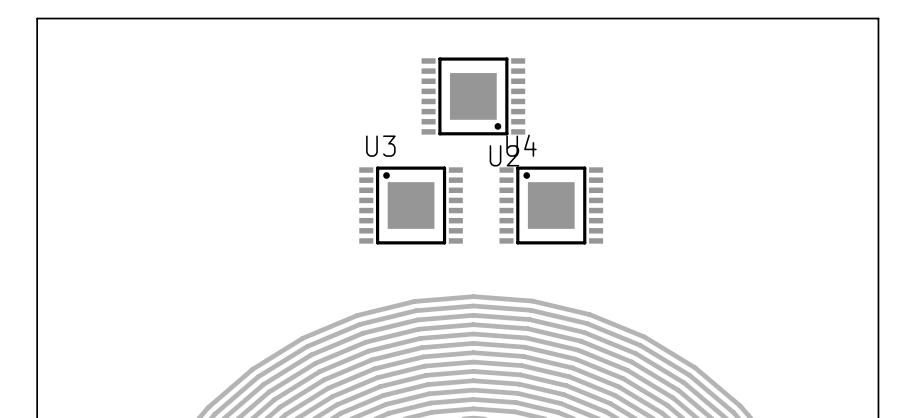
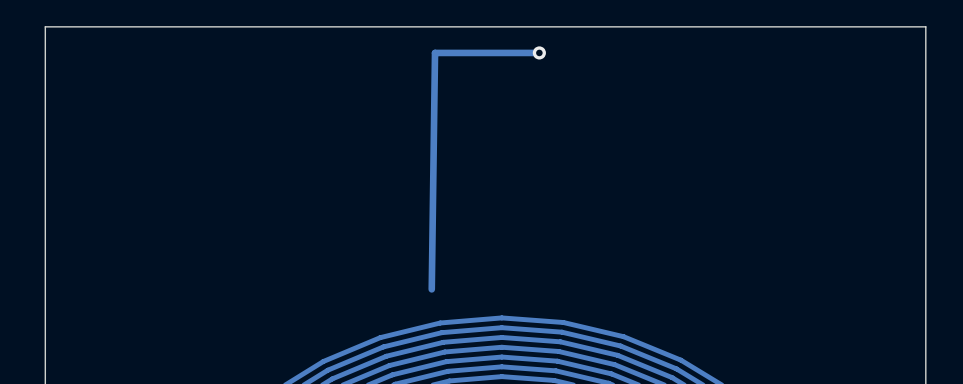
track: none -> (539, 52) (435, 52) (431, 289)
via: none -> (539, 52)
U2: (473, 96) -> none
U3: (411, 205) -> none
U4: (551, 205) -> none

